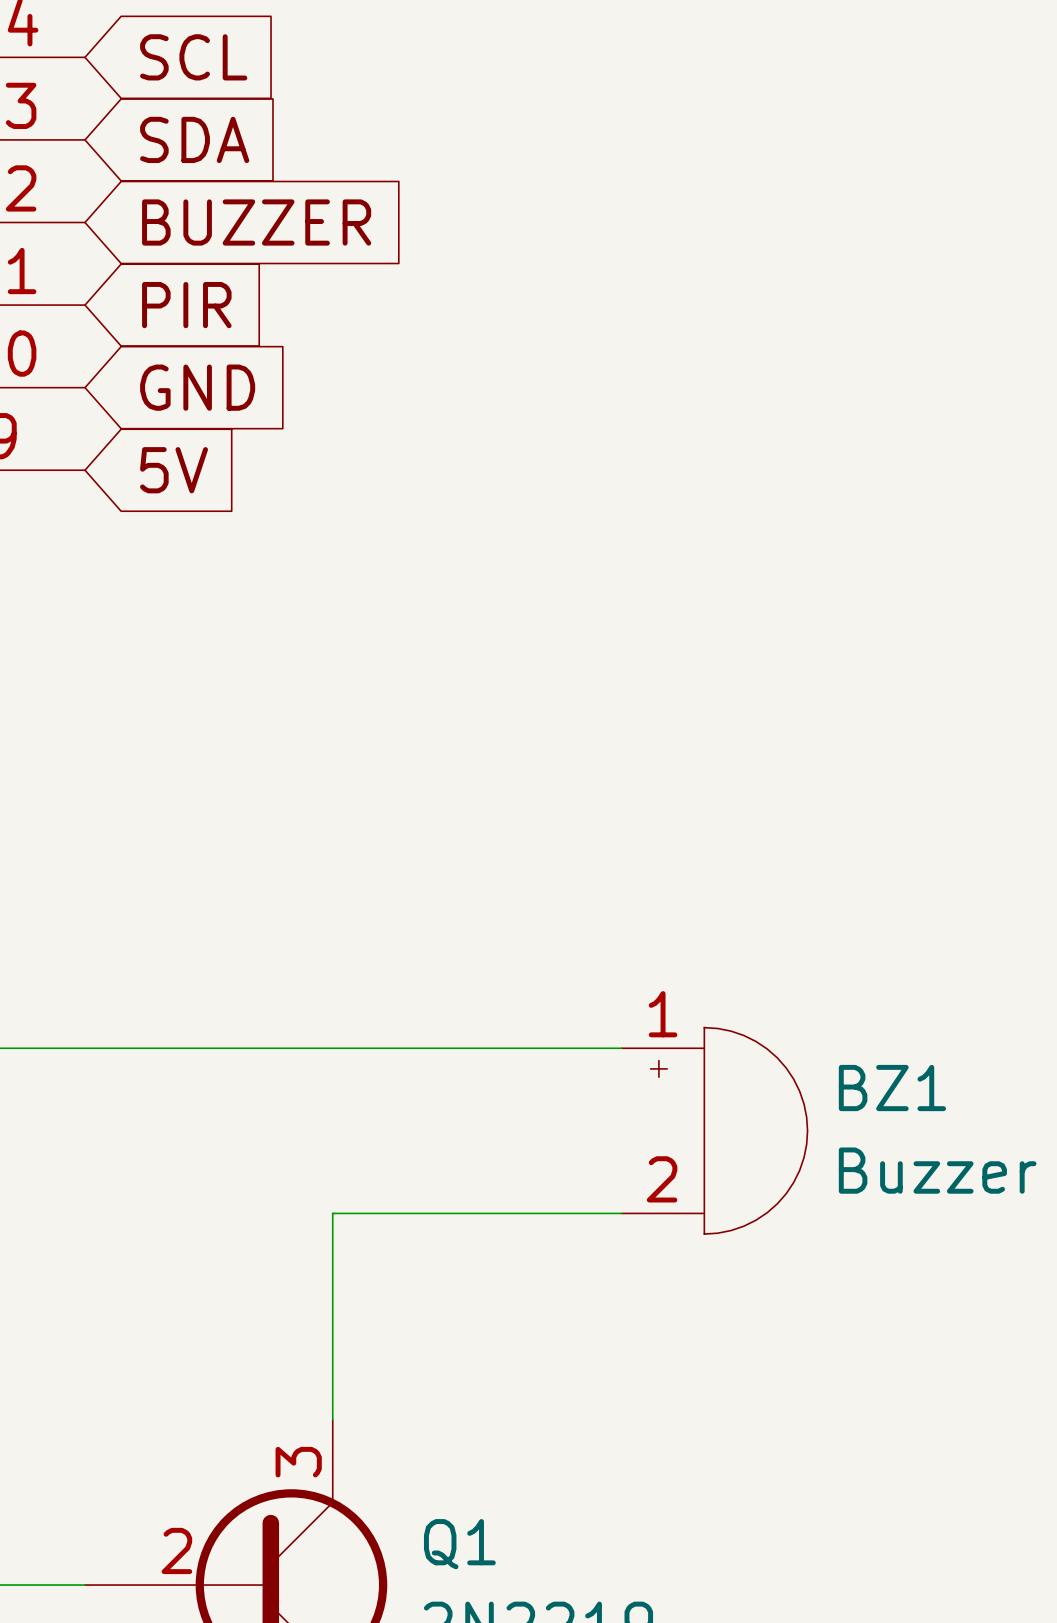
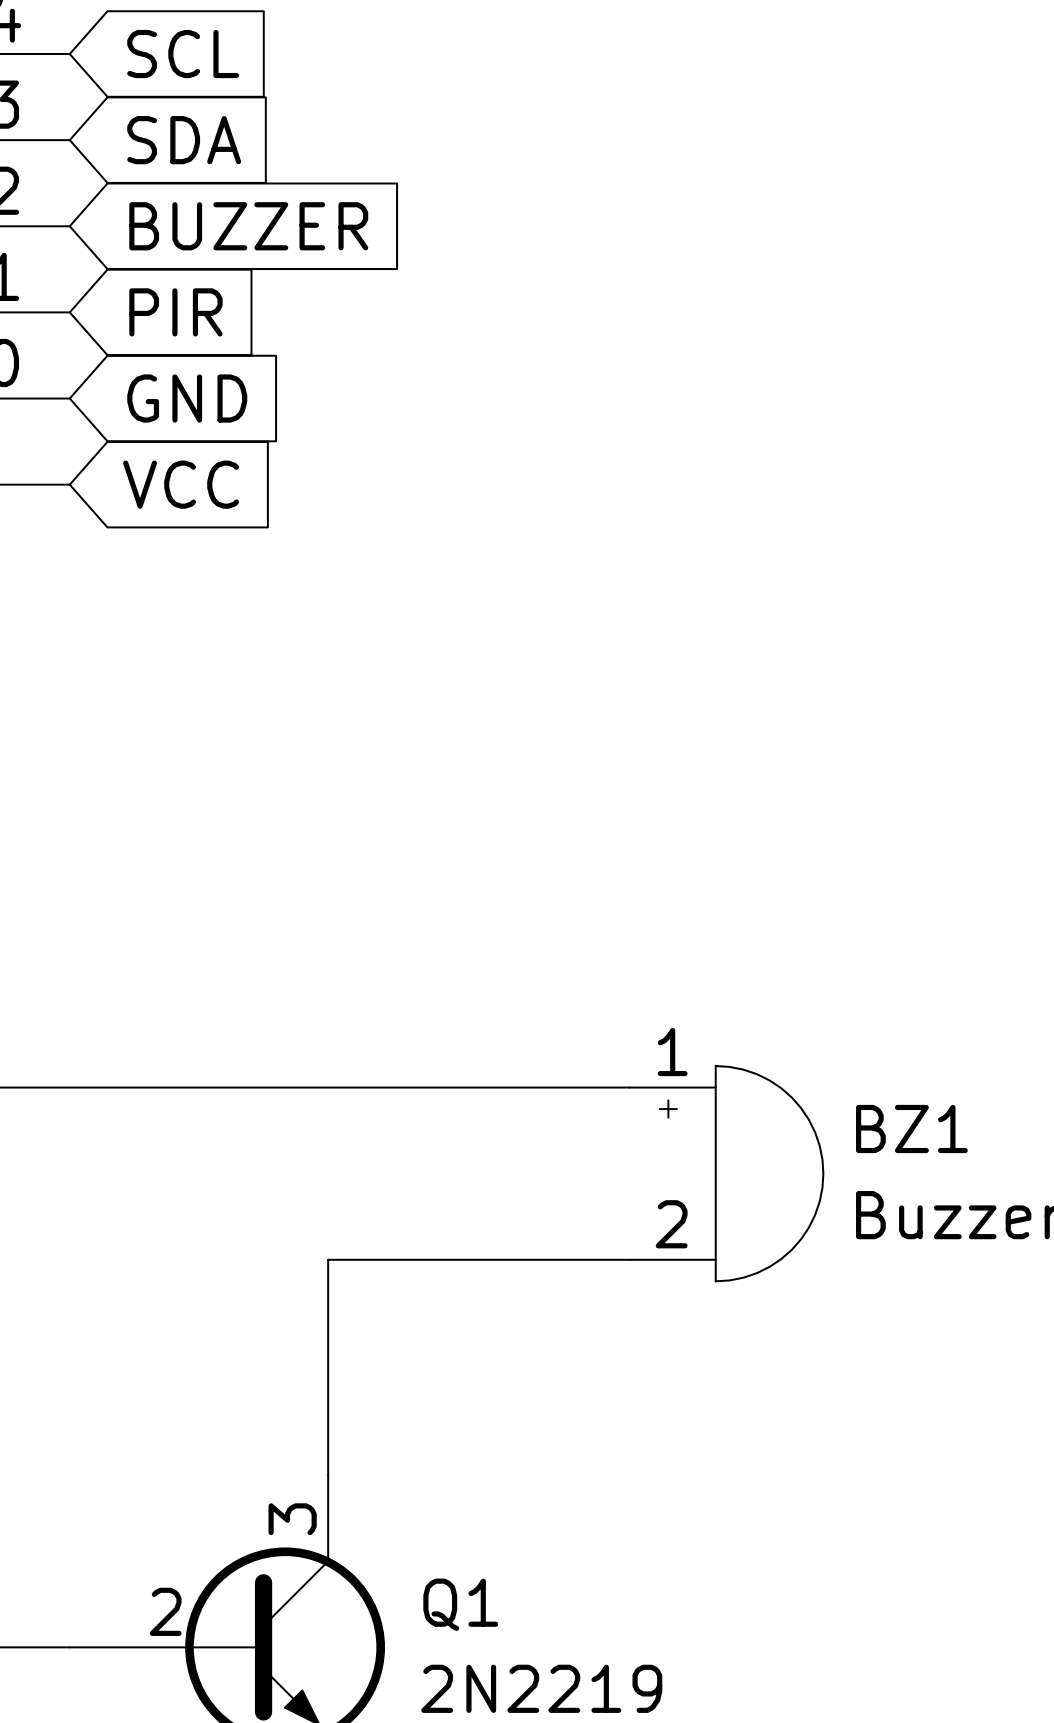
global label: 5V (174, 470) -> VCC (181, 484)

